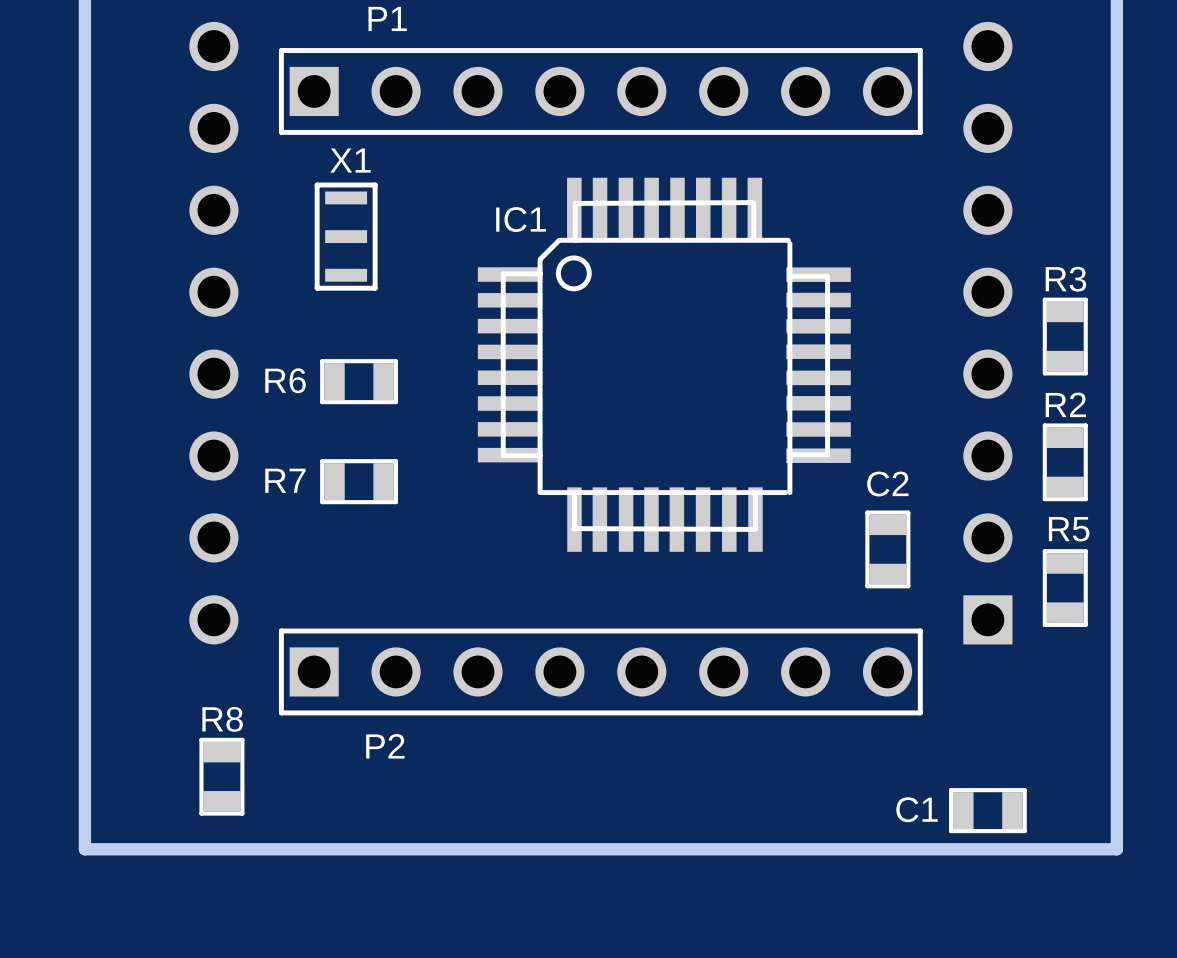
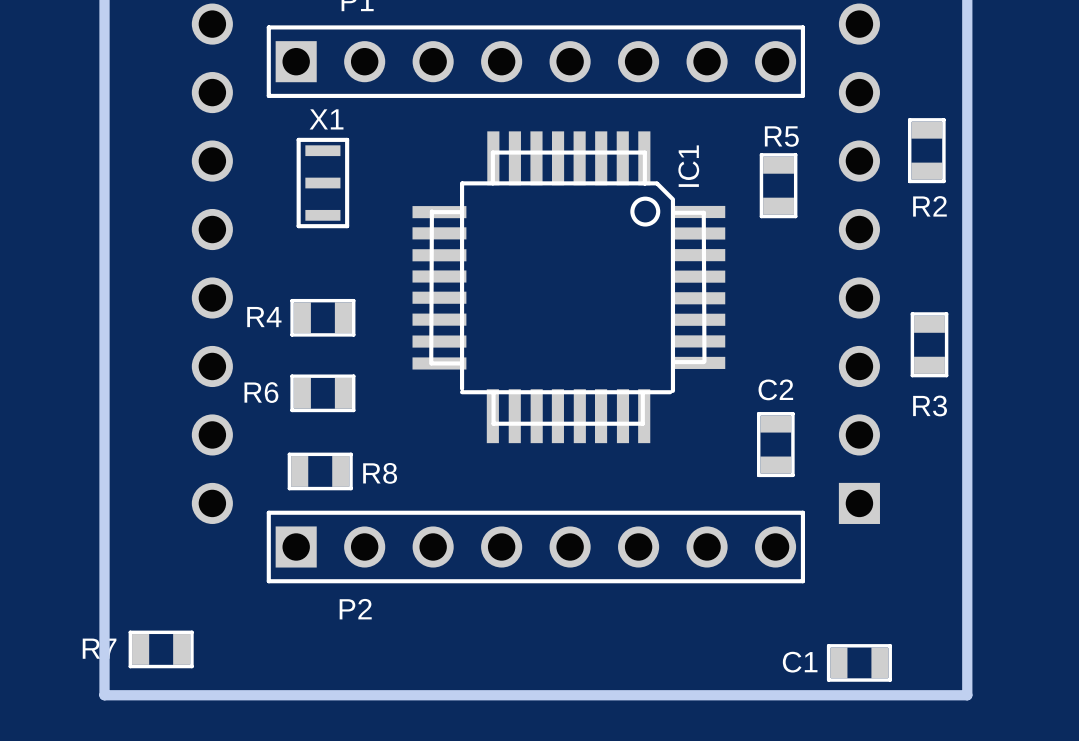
R3 name position: R3 (1065, 279) -> R3 (930, 405)
R3 position: (1065, 336) -> (929, 344)
IC1 rotation: 0° (664, 364) -> 90° clockwise (568, 287)
R6 position: (359, 381) -> (322, 393)
R4: none -> (322, 317)
R2 name position: R2 (1065, 404) -> R2 (929, 206)
R2 position: (1065, 462) -> (926, 150)
R7 position: (359, 481) -> (161, 649)
R5 position: (1065, 588) -> (778, 185)
R8 rotation: 0° (221, 776) -> 90° clockwise (320, 471)
R8 position: (221, 776) -> (320, 471)

